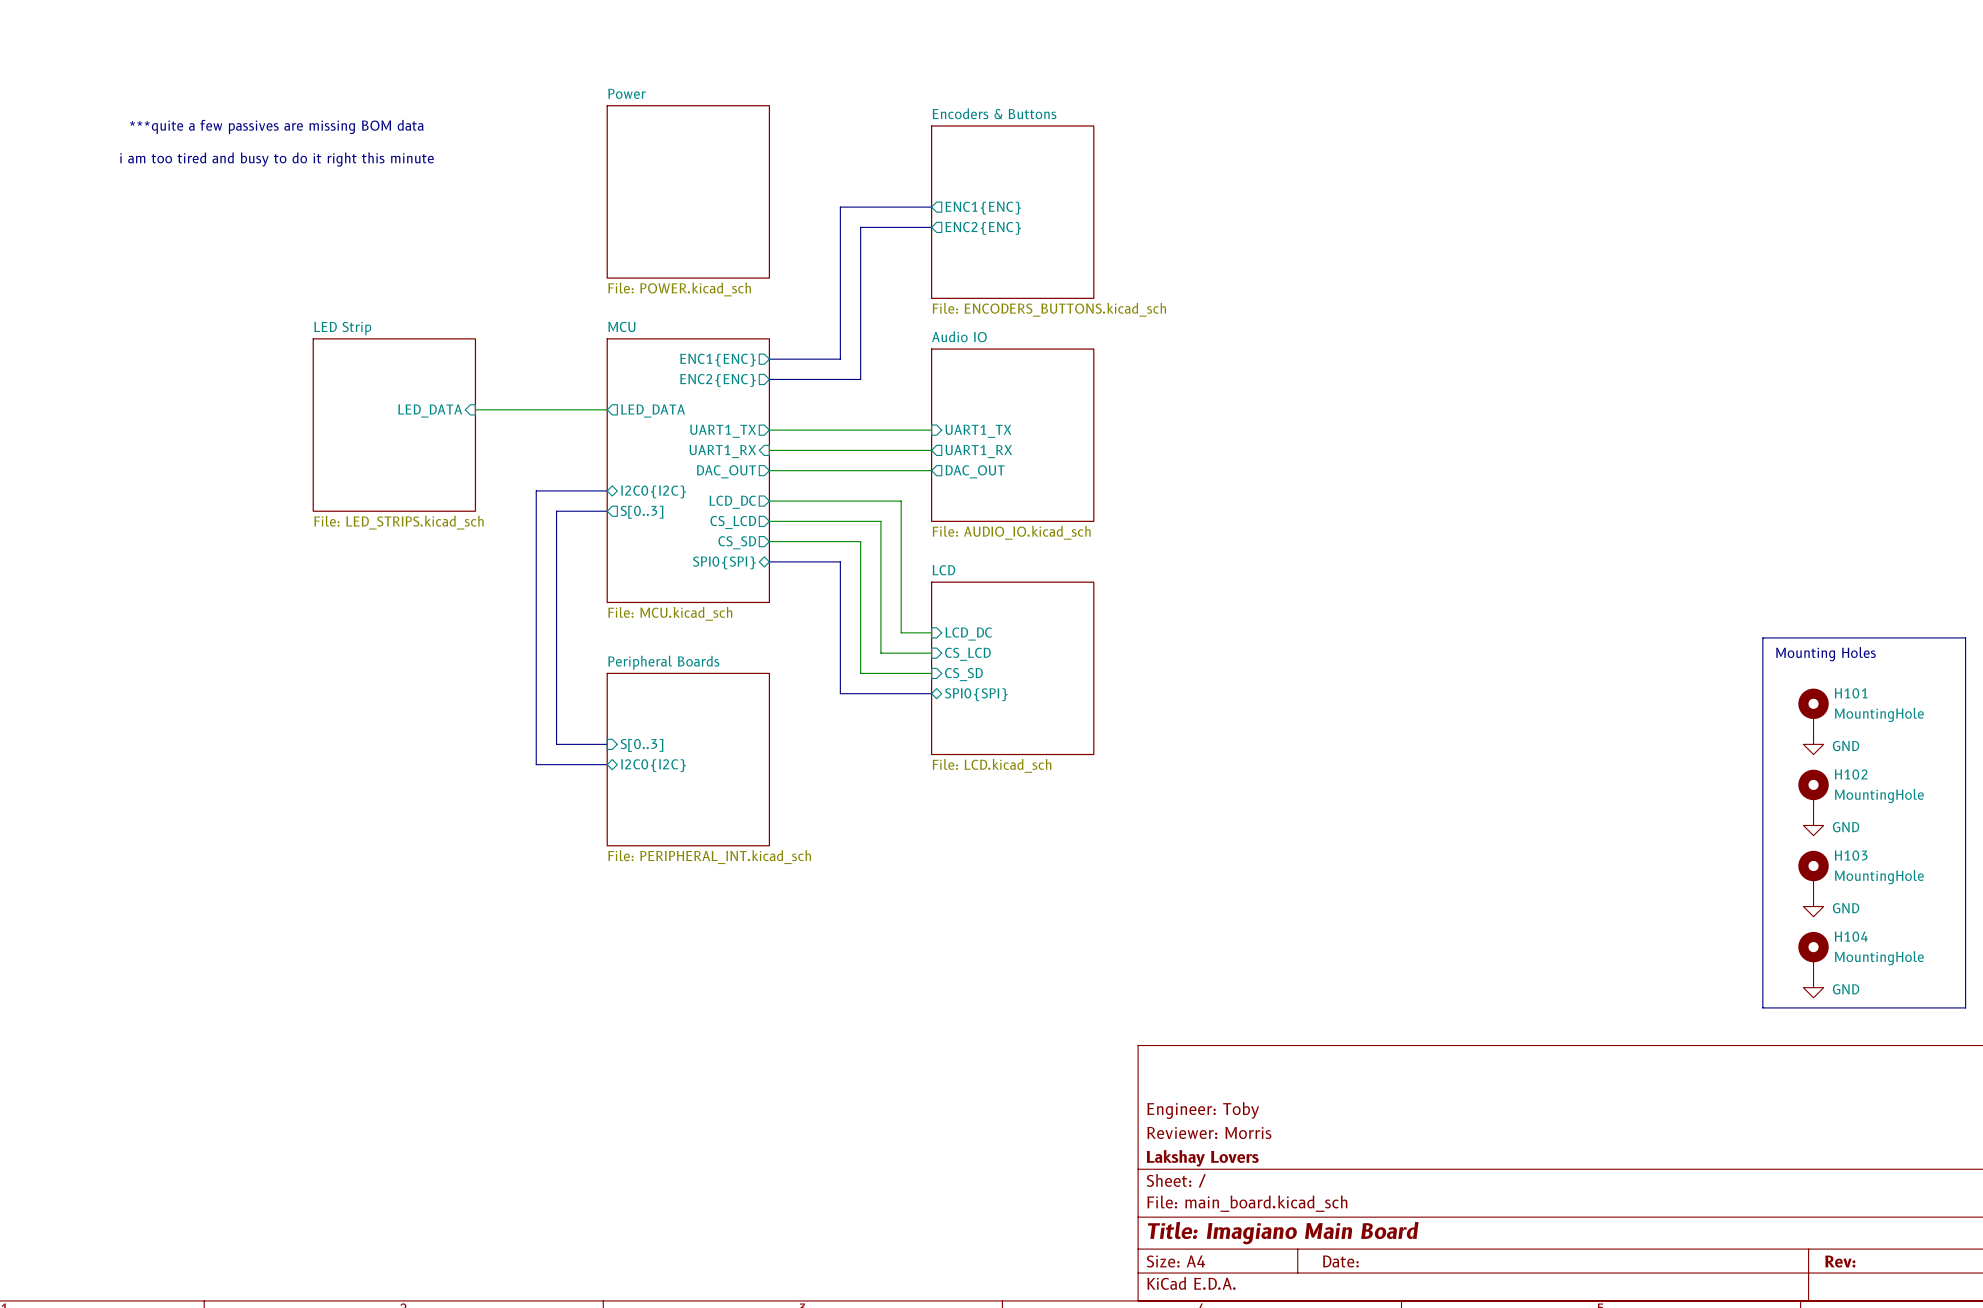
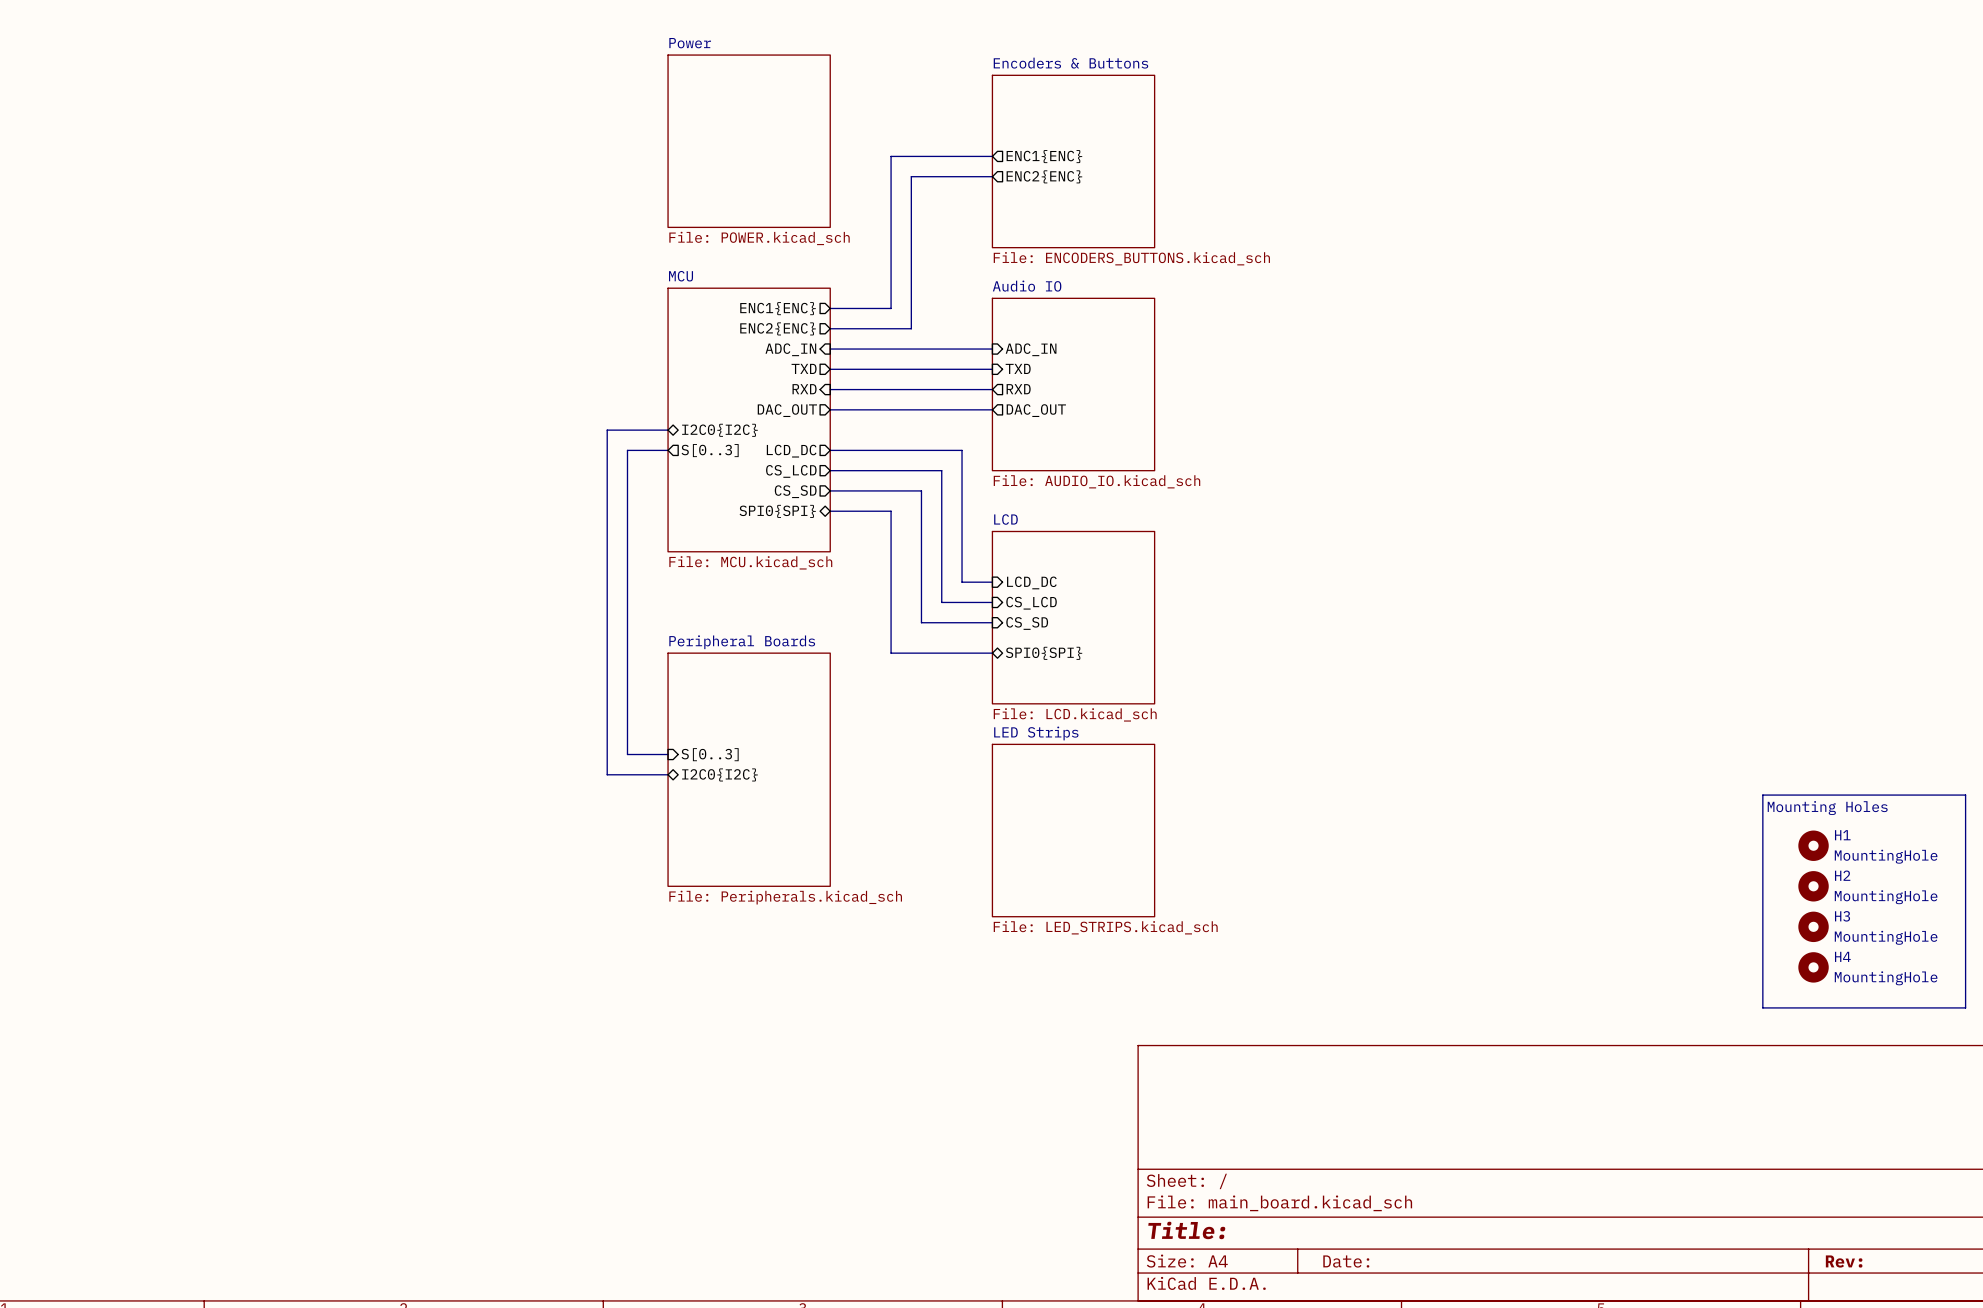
text: ***quite a few passives are missing BOM data (276, 126) -> none
bus: none -> (992, 156) (891, 156) (891, 308) (830, 308)
text: i am too tired and busy to do it right this minute (277, 159) -> none
bus: none -> (992, 176) (911, 176) (911, 328) (830, 328)
sheet Power position: (688, 191) -> (749, 141)
bus: (931, 207) (840, 207) (840, 359) (769, 359) -> none
sheet pin position: ENC1{ENC} (983, 208) -> ENC1{ENC} (1044, 156)
sheet Encoders & Buttons position: (1012, 212) -> (1073, 161)
bus: (931, 227) (860, 227) (860, 379) (769, 379) -> none
sheet pin position: ENC2{ENC} (983, 228) -> ENC2{ENC} (1044, 176)
wire: none -> (830, 349) (992, 349)
sheet pin: none -> ADC_IN (790, 349)
sheet pin: none -> ADC_IN (1031, 349)
sheet pin position: ENC1{ENC} (717, 360) -> ENC1{ENC} (778, 308)
sheet pin: none -> TXD (804, 368)
sheet pin: none -> TXD (1018, 368)
wire: none -> (830, 369) (992, 369)
sheet pin position: ENC2{ENC} (717, 380) -> ENC2{ENC} (778, 328)
sheet pin: none -> RXD (804, 389)
wire: none -> (830, 389) (992, 389)
sheet pin: none -> RXD (1018, 389)
wire: (475, 409) (607, 409) -> none
sheet pin: LED_DATA (430, 410) -> none
sheet pin: LED_DATA (653, 410) -> none
sheet pin: none -> DAC_OUT (787, 410)
sheet pin: none -> DAC_OUT (1036, 410)
sheet LED Strip: File: LED_STRIPS.kicad_sch (394, 425) -> none
bus: none -> (668, 430) (607, 430) (607, 774) (668, 774)
wire: (769, 430) (931, 430) -> (830, 409) (992, 409)
sheet pin: UART1_TX (723, 431) -> none
sheet pin: UART1_TX (978, 431) -> none
sheet Audio IO position: (1012, 435) -> (1073, 384)
bus: none -> (668, 450) (627, 450) (627, 754) (668, 754)
wire: (769, 450) (830, 450) -> none
wire: none -> (931, 450) (962, 450) (962, 582) (992, 582)
sheet pin: UART1_RX (722, 451) -> none
sheet pin: UART1_RX (978, 451) -> none
sheet MCU position: (688, 470) -> (749, 419)
wire: (769, 470) (830, 470) -> none
wire: none -> (931, 470) (941, 470) (941, 602) (992, 602)
sheet pin: DAC_OUT (726, 471) -> none
sheet pin: DAC_OUT (975, 471) -> none
bus: (607, 490) (536, 490) (536, 764) (607, 764) -> none
sheet pin position: I2C0{I2C} (653, 491) -> I2C0{I2C} (719, 430)
wire: (769, 501) (901, 501) (901, 632) (931, 632) -> none
sheet pin position: LCD_DC (732, 502) -> LCD_DC (791, 451)
bus: (607, 511) (556, 511) (556, 744) (607, 744) -> none
bus: none -> (830, 511) (891, 511) (891, 653) (992, 653)
sheet pin position: S[0..3] (642, 512) -> S[0..3] (710, 450)
wire: (769, 521) (880, 521) (880, 653) (931, 653) -> none
sheet pin position: CS_LCD (733, 522) -> CS_LCD (791, 471)
wire: (769, 541) (860, 541) (860, 673) (931, 673) -> (830, 490) (921, 490) (921, 622) (992, 622)
sheet pin position: CS_SD (737, 542) -> CS_SD (795, 491)
bus: (769, 561) (840, 561) (840, 693) (931, 693) -> none
sheet pin position: SPI0{SPI} (724, 562) -> SPI0{SPI} (777, 511)
sheet pin position: LCD_DC (968, 634) -> LCD_DC (1031, 582)
sheet pin position: CS_LCD (967, 654) -> CS_LCD (1031, 603)
text position: Mounting Holes (1825, 654) -> Mounting Holes (1827, 808)
sheet LCD position: (1012, 668) -> (1073, 617)
sheet pin position: CS_SD (963, 674) -> CS_SD (1027, 623)
sheet pin position: SPI0{SPI} (976, 694) -> SPI0{SPI} (1044, 653)
H101: MountingHole (1813, 711) -> none
power symbol: GND (1813, 744) -> none
sheet pin position: S[0..3] (642, 745) -> S[0..3] (710, 754)
sheet Peripheral Boards: File: PERIPHERAL_INT.kicad_sch (688, 759) -> none
sheet pin position: I2C0{I2C} (653, 765) -> I2C0{I2C} (719, 774)
sheet Peripheral Boards: none -> File: Peripherals.kicad_sch (749, 769)
H102: MountingHole (1813, 792) -> none
line: (1762, 795) (1762, 637) (1965, 637) (1965, 795) -> (1762, 795) (1965, 795)
power symbol: GND (1813, 825) -> none
sheet LED Strips: none -> File: LED_STRIPS.kicad_sch (1073, 830)
H1: none -> MountingHole (1813, 845)
H103: MountingHole (1813, 873) -> none
H2: none -> MountingHole (1813, 886)
power symbol: GND (1813, 906) -> none
H3: none -> MountingHole (1813, 926)
H104: MountingHole (1813, 954) -> none
H4: none -> MountingHole (1813, 967)
power symbol: GND (1813, 987) -> none
title block: Engineer: Toby (1203, 1110) -> none
title block: Reviewer: Morris (1209, 1132) -> none
title block: Lakshay Lovers (1202, 1158) -> none
title block: Title: Imagiano Main Board (1283, 1233) -> Title: (1186, 1230)

